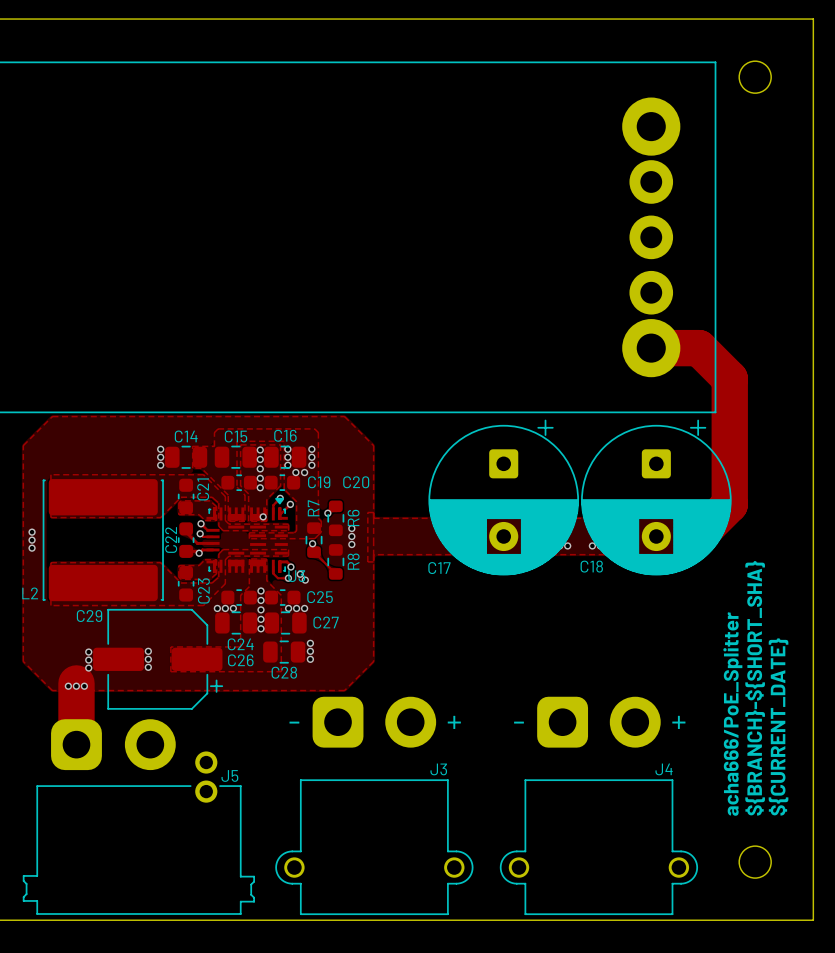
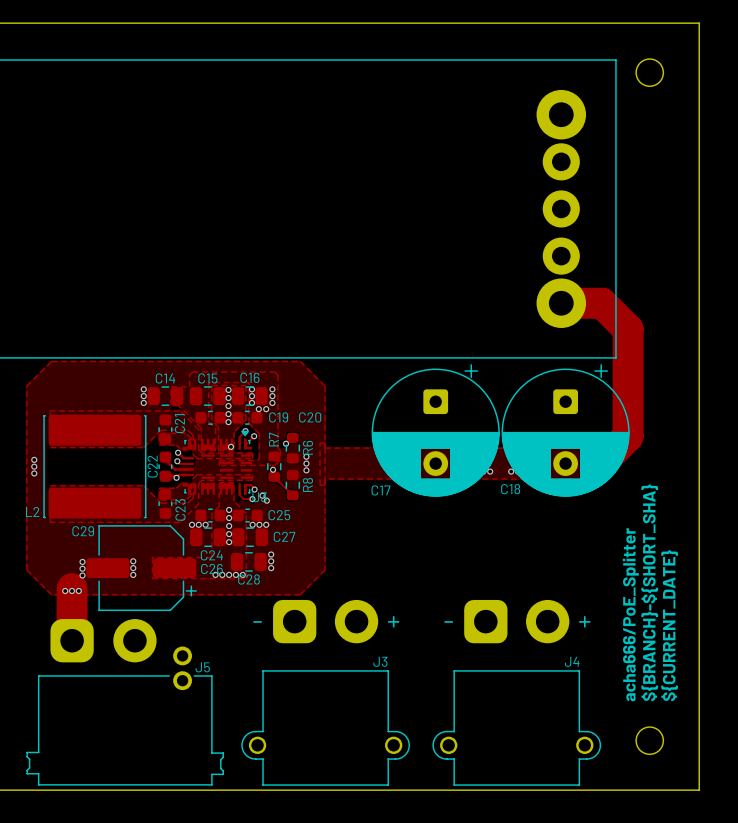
via: none -> (215, 574)
via: none -> (222, 574)
via: none -> (229, 574)
via: none -> (235, 574)
via: none -> (242, 574)

